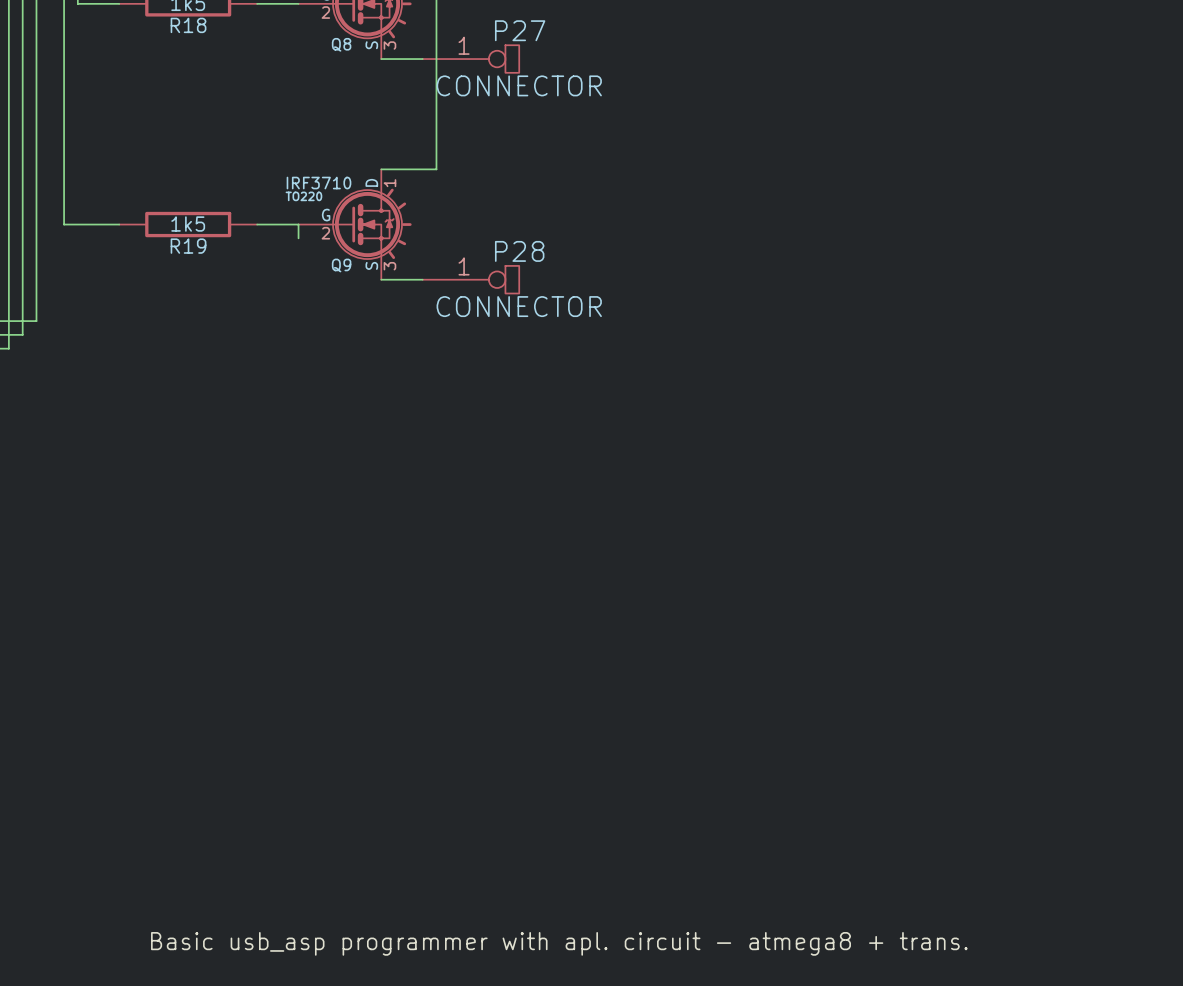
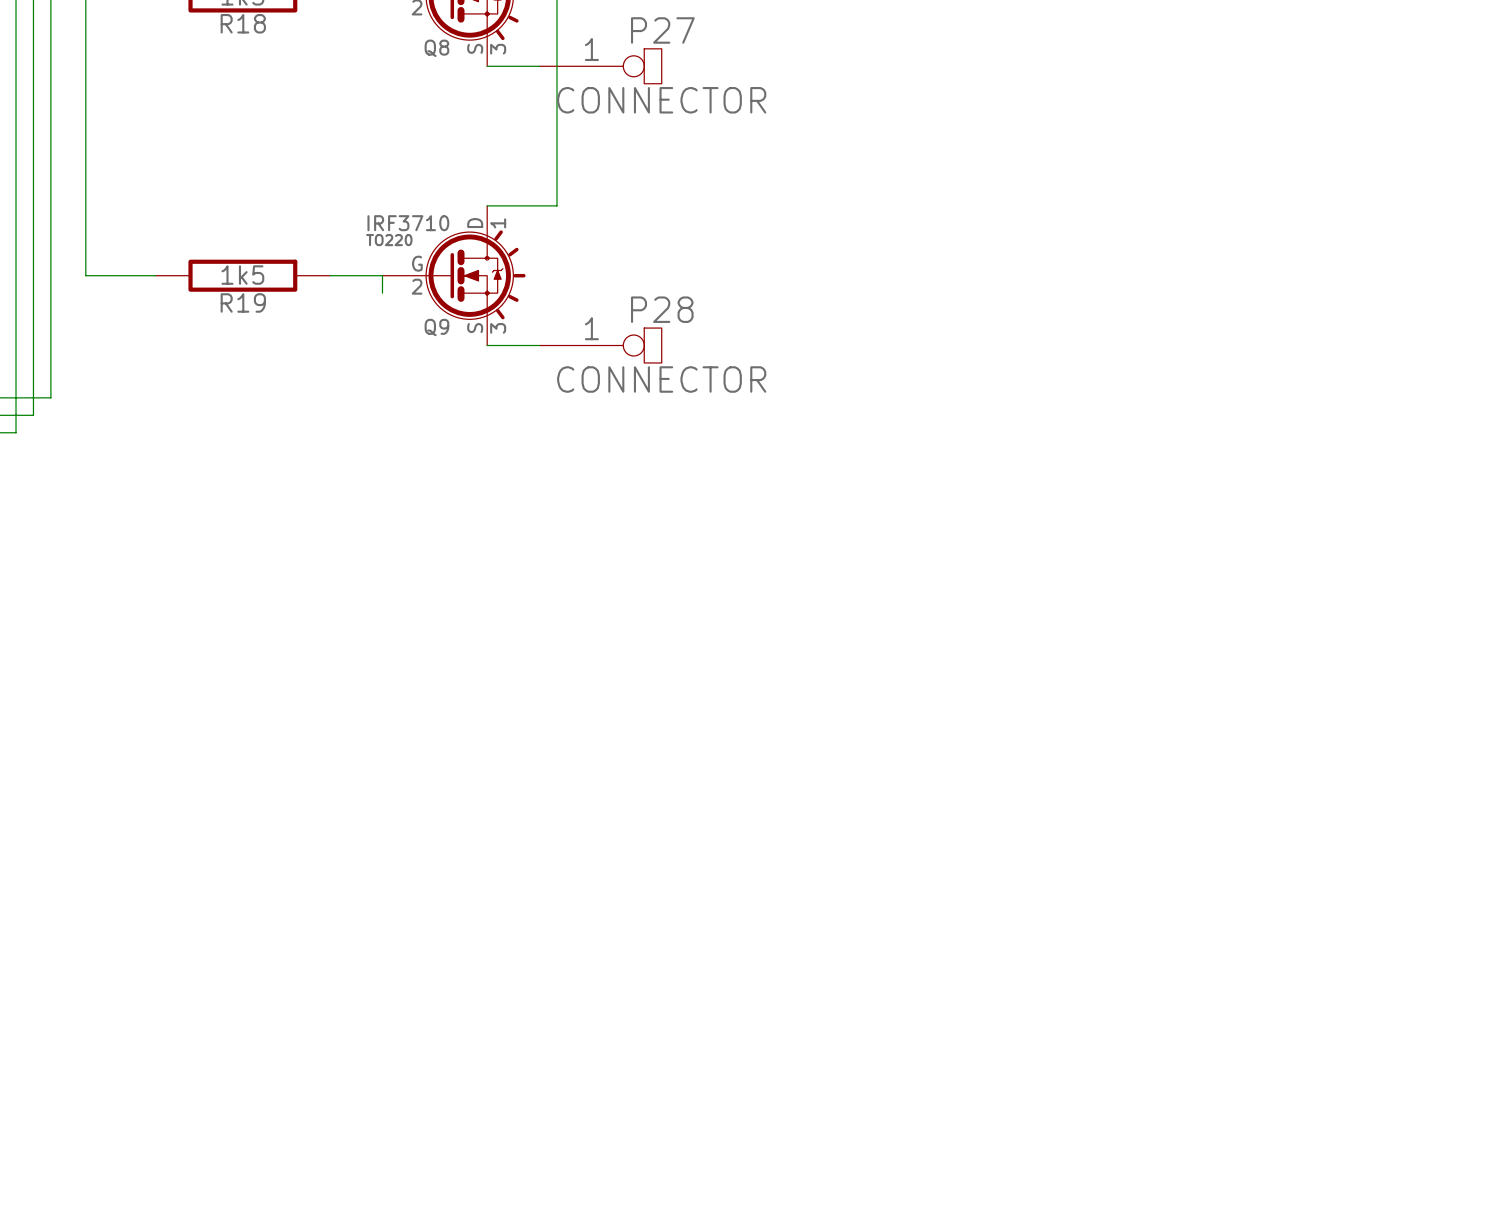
label: Basic usb_asp programmer with apl. circuit - atmega8 + trans. (559, 943) -> none

